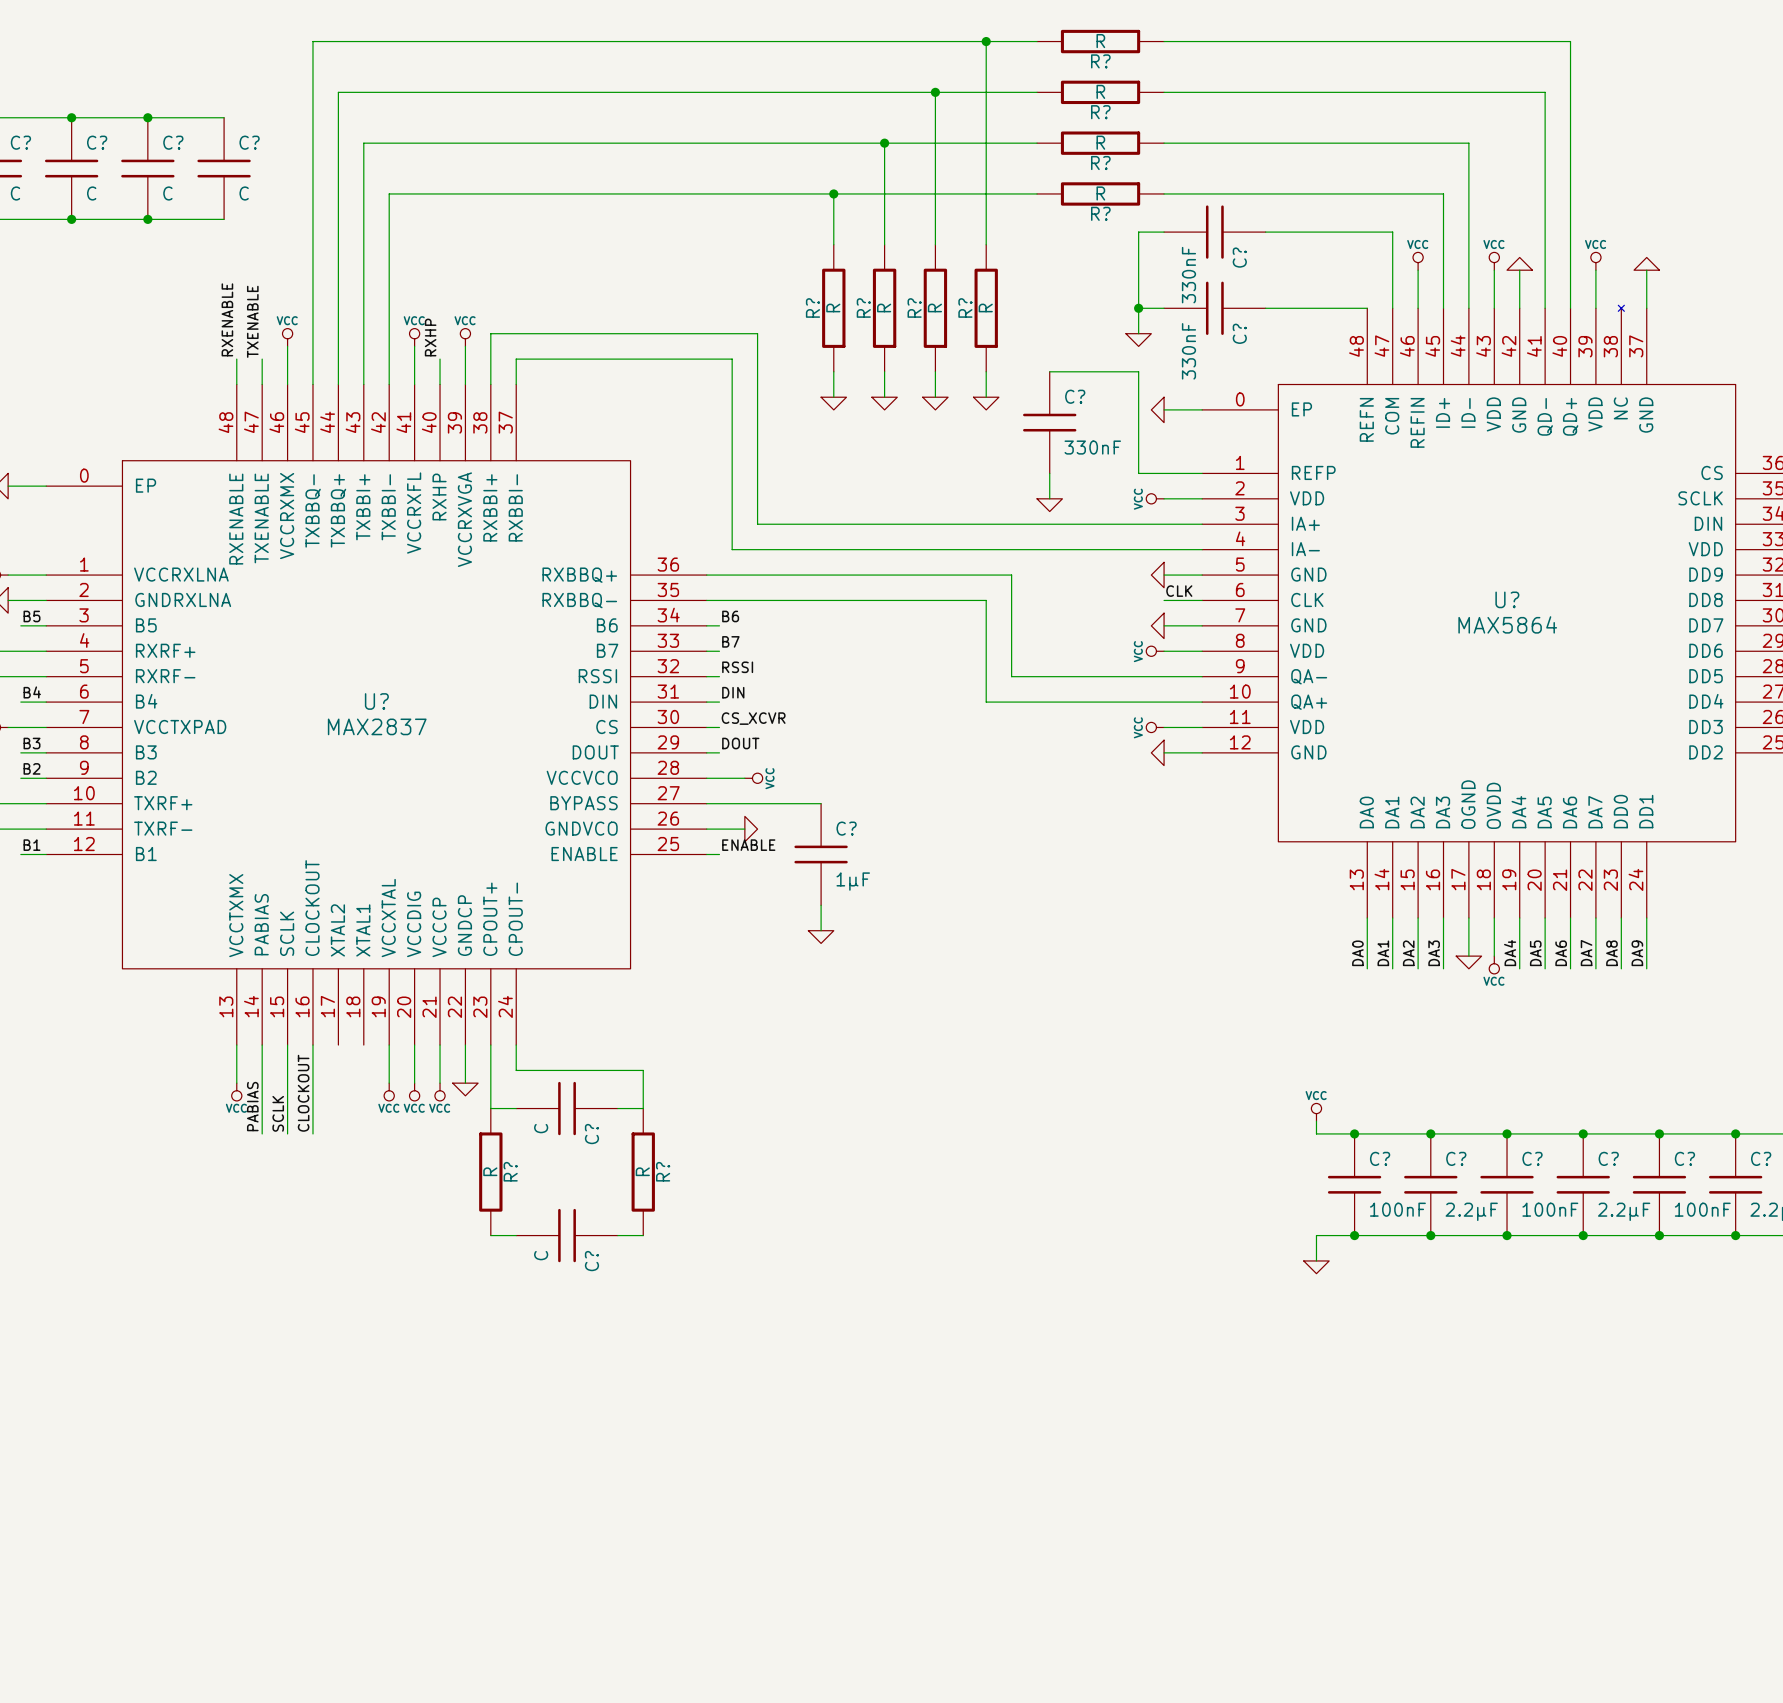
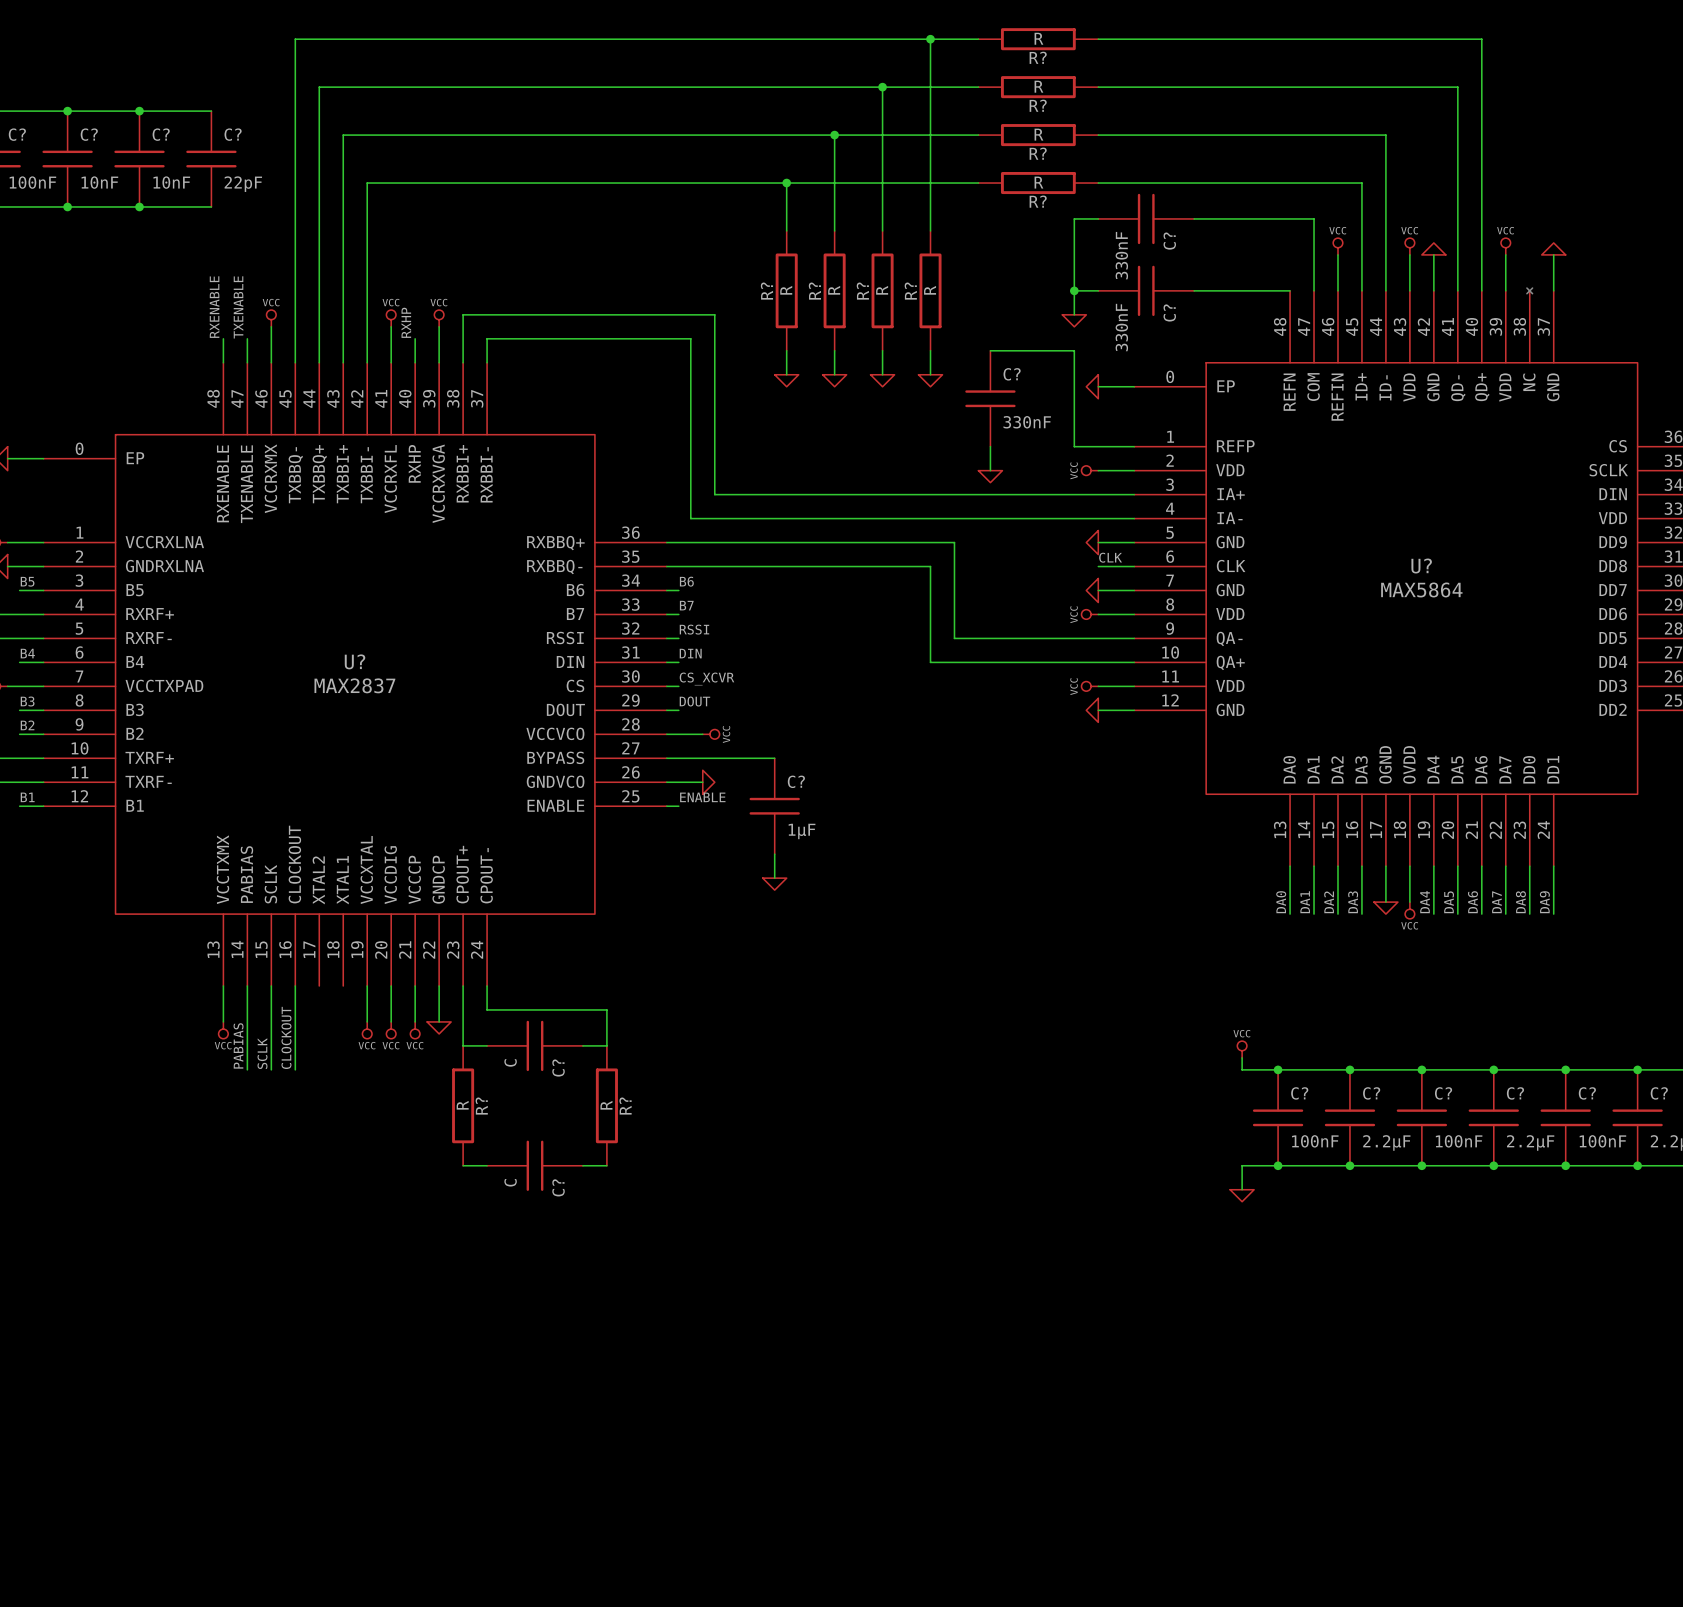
C? value: C (15, 193) -> 100nF (32, 182)
C? value: C (91, 193) -> 10nF (99, 182)
C? value: C (167, 193) -> 10nF (171, 182)
C? value: C (244, 193) -> 22pF (243, 184)

